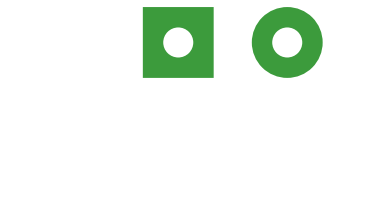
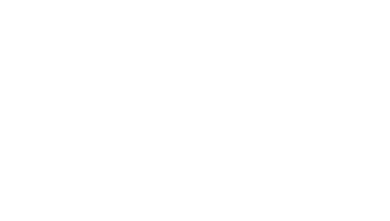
part: (232, 42) -> none

